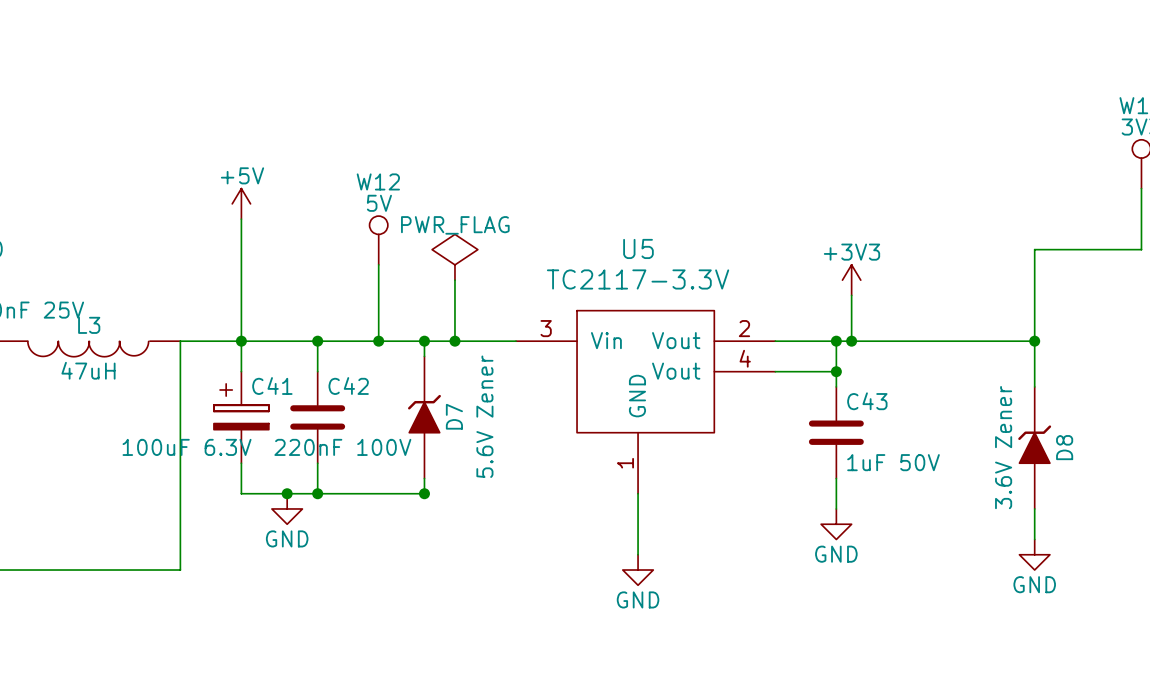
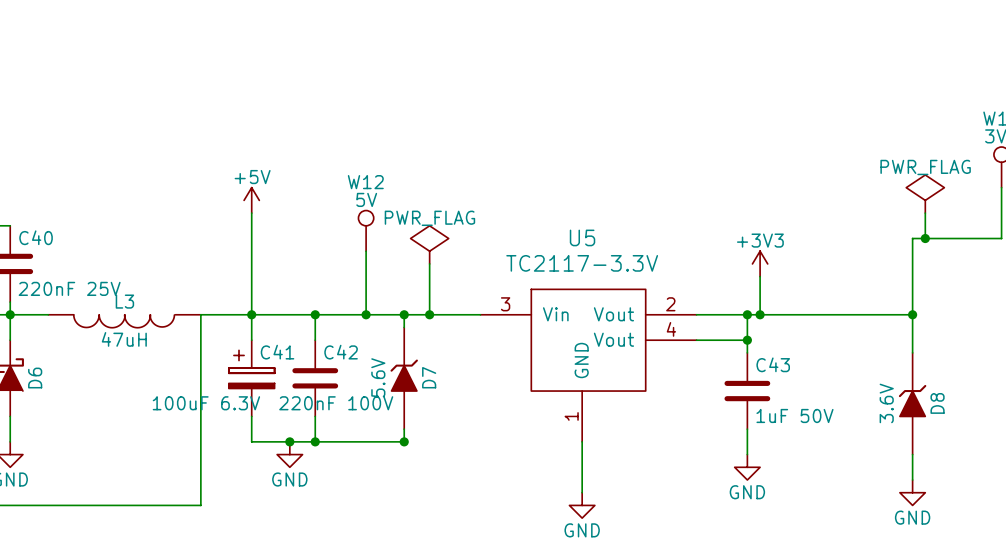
power symbol: none -> PWR_FLAG (925, 194)
wire: none -> (925, 213) (925, 238)
junction: none -> (925, 238)
D7 value: 5.6V Zener (484, 416) -> 5.6V (378, 377)
D8 value: 3.6V Zener (1003, 447) -> 3.6V (886, 403)

